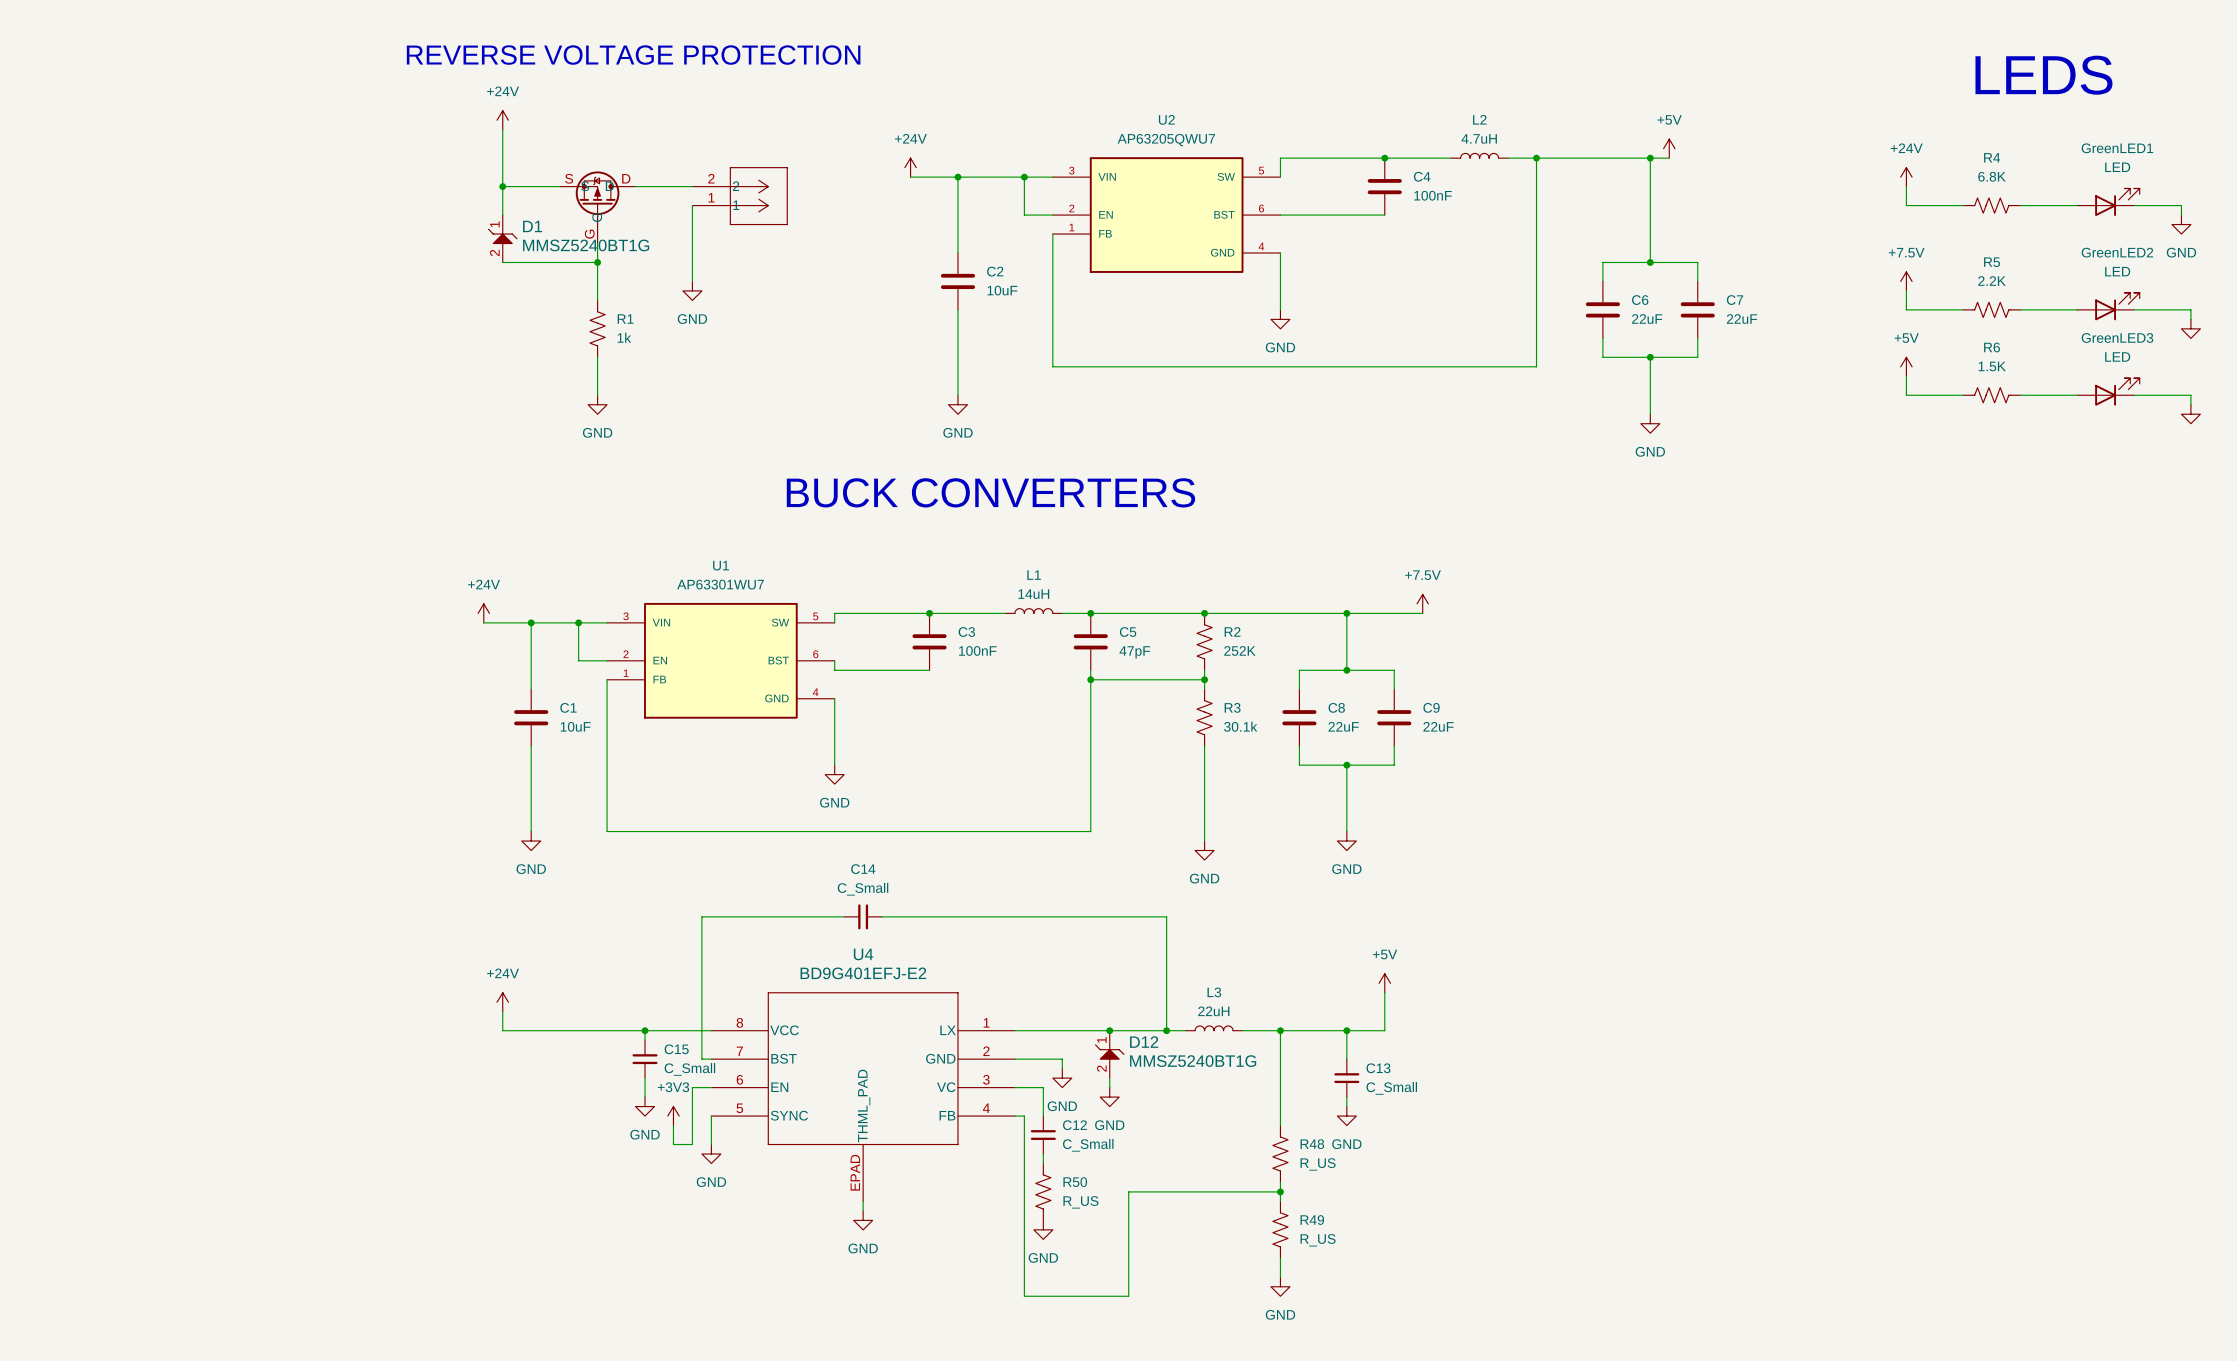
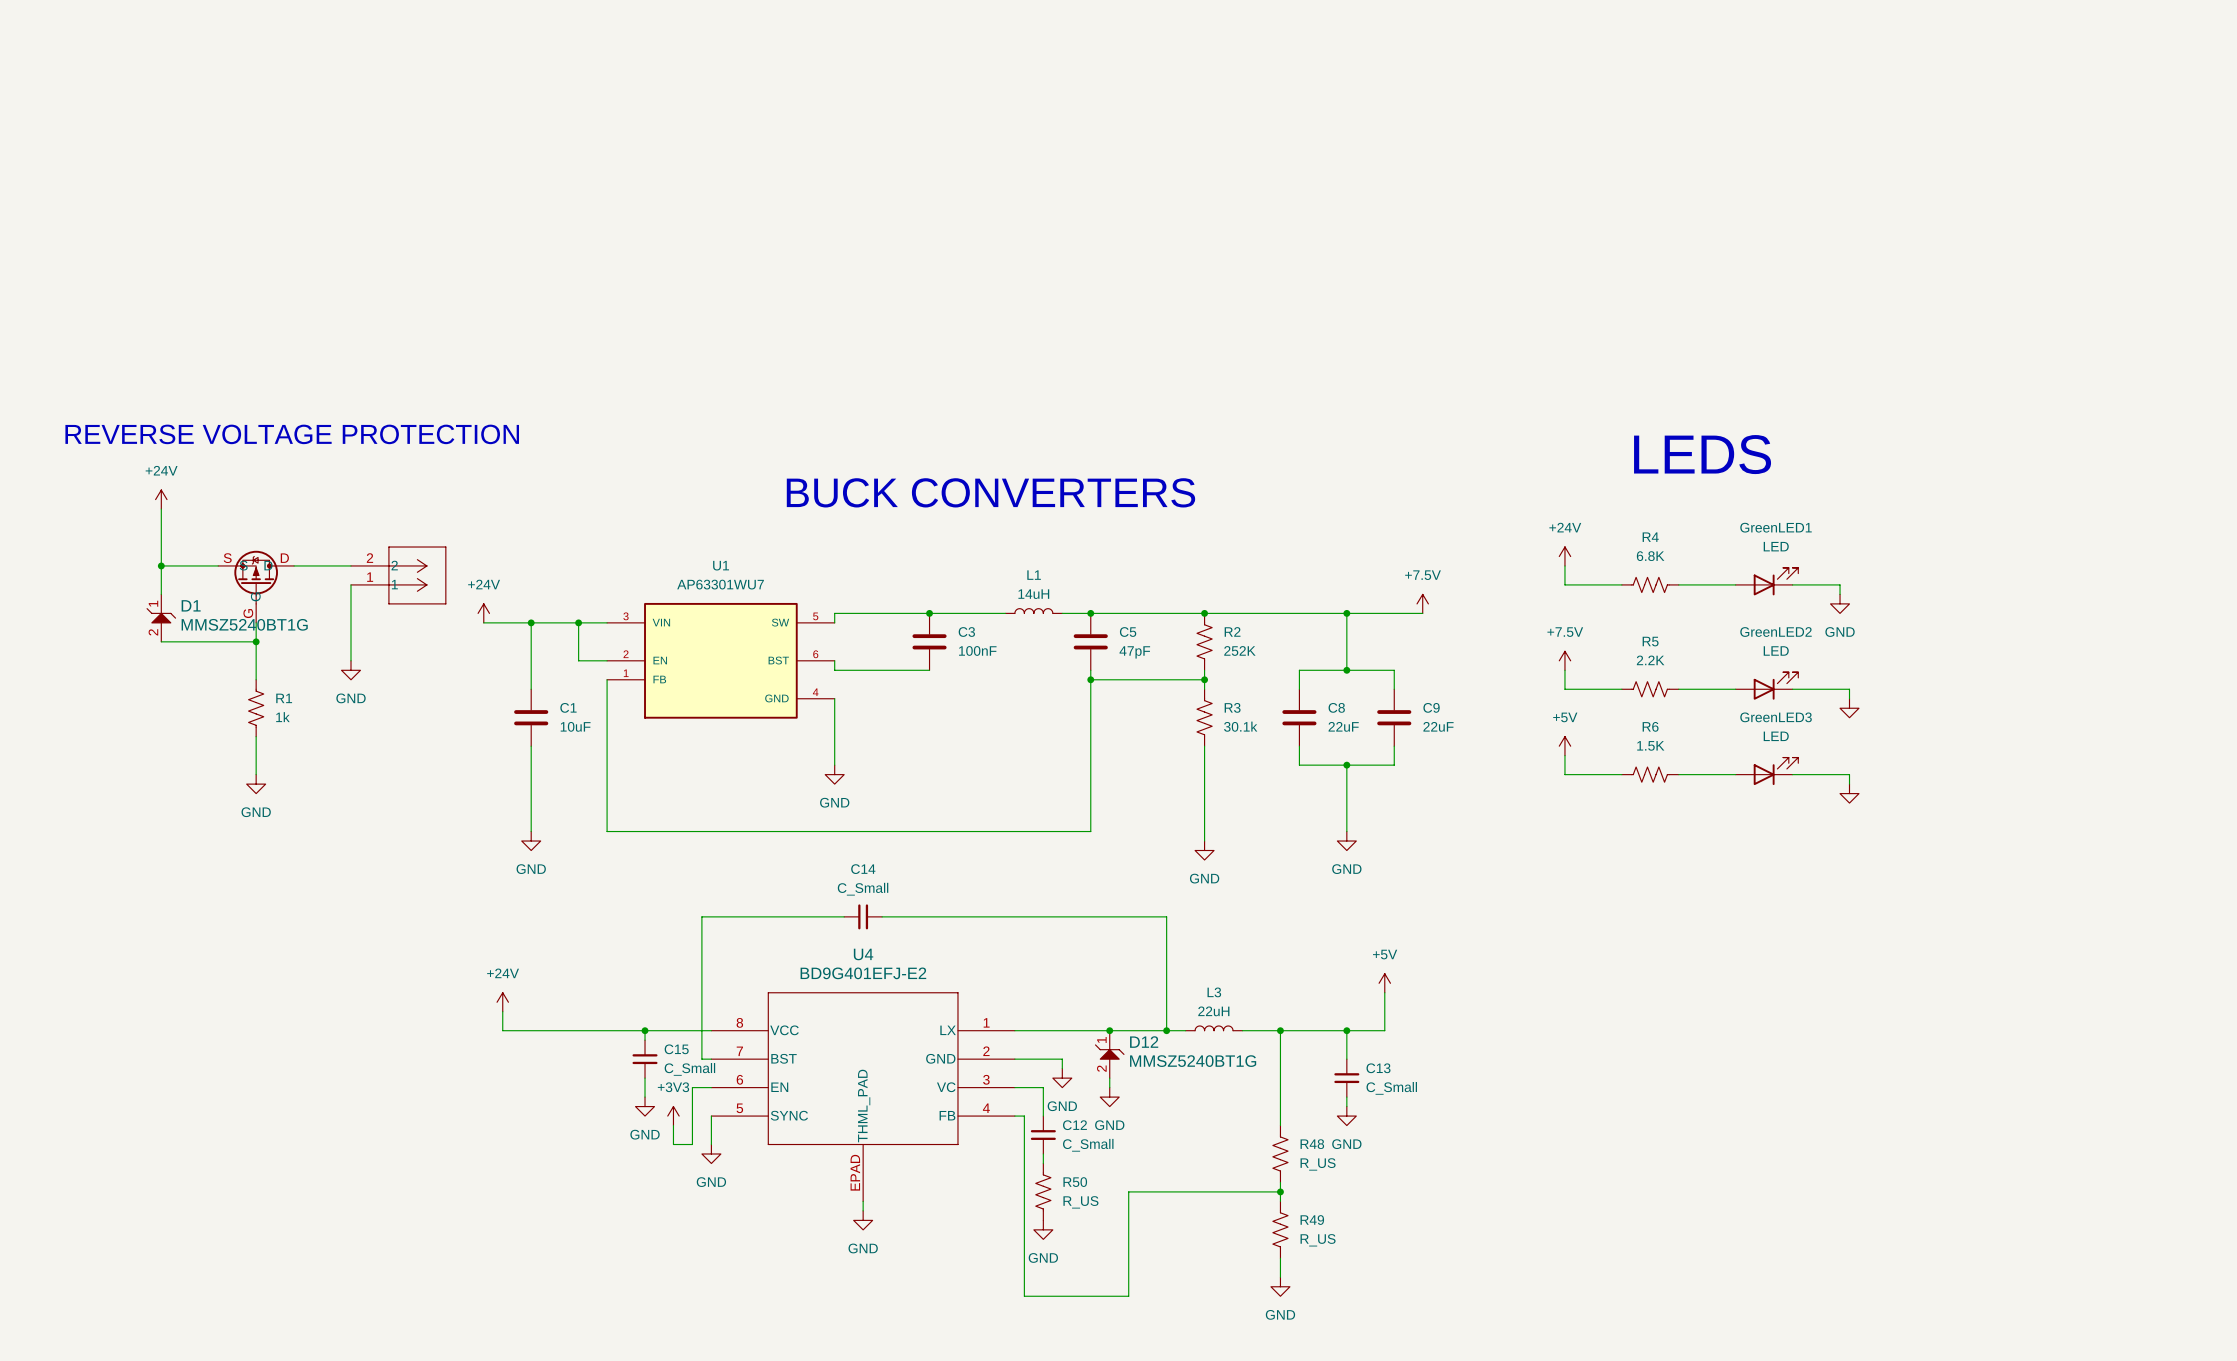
text: REVERSE VOLTAGE PROTECTION (633, 55) -> none
text: LEDS (2043, 75) -> none
power symbol: +24V (502, 120) -> none
wire: (502, 129) (502, 215) -> none
power symbol: +5V (1669, 148) -> none
L2: 4.7uH (1479, 155) -> none
junction: (1384, 158) -> none
wire: (1451, 158) (1280, 158) (1280, 177) -> none
wire: (1508, 158) (1669, 158) -> none
wire: (1536, 158) (1536, 366) (1052, 366) (1052, 234) -> none
junction: (1536, 158) -> none
wire: (1650, 158) (1650, 262) -> none
junction: (1650, 158) -> none
power symbol: +24V (910, 167) -> none
wire: (910, 177) (1052, 177) -> none
wire: (957, 177) (957, 252) -> none
junction: (957, 177) -> none
wire: (1024, 177) (1024, 215) (1052, 215) -> none
junction: (1024, 177) -> none
power symbol: +24V (1906, 177) -> none
wire: (502, 186) (559, 186) -> none
junction: (502, 186) -> none
wire: (635, 186) (692, 186) -> none
C4: 100nF (1384, 186) -> none
wire: (1906, 186) (1906, 205) (1963, 205) -> none
part: (740, 196) -> none
GreenLED1 position: (2108, 202) -> (1766, 581)
wire: (692, 205) (692, 281) -> none
R4 position: (1991, 205) -> (1650, 584)
wire: (2020, 205) (2077, 205) -> none
wire: (2134, 205) (2181, 205) (2181, 215) -> none
part: (597, 207) -> none
U2: AP63205QWU7 (1166, 215) -> none
wire: (1280, 215) (1384, 215) -> none
power symbol: GND (2181, 224) -> none
D1 position: (502, 238) -> (161, 618)
wire: (597, 243) (597, 300) -> none
wire: (1280, 252) (1280, 309) -> none
wire: (502, 262) (597, 262) -> none
junction: (597, 262) -> none
junction: (1650, 262) -> none
C2: 10uF (957, 281) -> none
wire: (1602, 281) (1602, 262) (1697, 262) (1697, 281) -> none
power symbol: +7.5V (1906, 281) -> none
power symbol: GND (692, 290) -> none
wire: (1906, 290) (1906, 309) (1963, 309) -> none
GreenLED2 position: (2108, 306) -> (1766, 685)
wire: (957, 309) (957, 395) -> none
C6: 22uF (1602, 309) -> none
C7: 22uF (1697, 309) -> none
R5 position: (1991, 309) -> (1650, 689)
wire: (2020, 309) (2077, 309) -> none
wire: (2134, 309) (2190, 309) (2190, 319) -> none
power symbol: GND (1280, 319) -> none
R1 position: (597, 328) -> (256, 708)
power symbol: (2190, 328) -> none
wire: (1602, 338) (1602, 357) (1697, 357) (1697, 338) -> none
wire: (597, 357) (597, 395) -> none
wire: (1650, 357) (1650, 414) -> none
junction: (1650, 357) -> none
power symbol: +5V (1906, 366) -> none
wire: (1906, 376) (1906, 395) (1963, 395) -> none
GreenLED3 position: (2108, 391) -> (1766, 771)
R6 position: (1991, 395) -> (1650, 774)
wire: (2020, 395) (2077, 395) -> none
wire: (2134, 395) (2190, 395) (2190, 404) -> none
power symbol: GND (597, 404) -> none
power symbol: GND (957, 404) -> none
power symbol: (2190, 414) -> none
power symbol: GND (1650, 423) -> none
text: none -> REVERSE VOLTAGE PROTECTION (292, 434)
text: none -> LEDS (1702, 454)
power symbol: none -> +24V (161, 499)
wire: none -> (161, 509) (161, 594)
power symbol: none -> +24V (1564, 556)
wire: none -> (161, 565) (218, 565)
junction: none -> (161, 565)
wire: none -> (294, 565) (351, 565)
wire: none -> (1564, 565) (1564, 584) (1621, 584)
part: none -> (398, 575)
wire: none -> (351, 584) (351, 660)
wire: none -> (1678, 584) (1735, 584)
wire: none -> (1792, 584) (1840, 584) (1840, 594)
part: none -> (256, 586)
power symbol: none -> GND (1840, 603)
wire: none -> (256, 622) (256, 679)
wire: none -> (161, 641) (256, 641)
junction: none -> (256, 641)
power symbol: none -> +7.5V (1564, 660)
power symbol: none -> GND (351, 670)
wire: none -> (1564, 670) (1564, 689) (1621, 689)
wire: none -> (1678, 689) (1735, 689)
wire: none -> (1792, 689) (1849, 689) (1849, 698)
power symbol: none -> (1849, 708)
wire: none -> (256, 736) (256, 774)
power symbol: none -> +5V (1564, 746)
wire: none -> (1564, 755) (1564, 774) (1621, 774)
wire: none -> (1678, 774) (1735, 774)
wire: none -> (1792, 774) (1849, 774) (1849, 784)
power symbol: none -> GND (256, 784)
power symbol: none -> (1849, 793)

